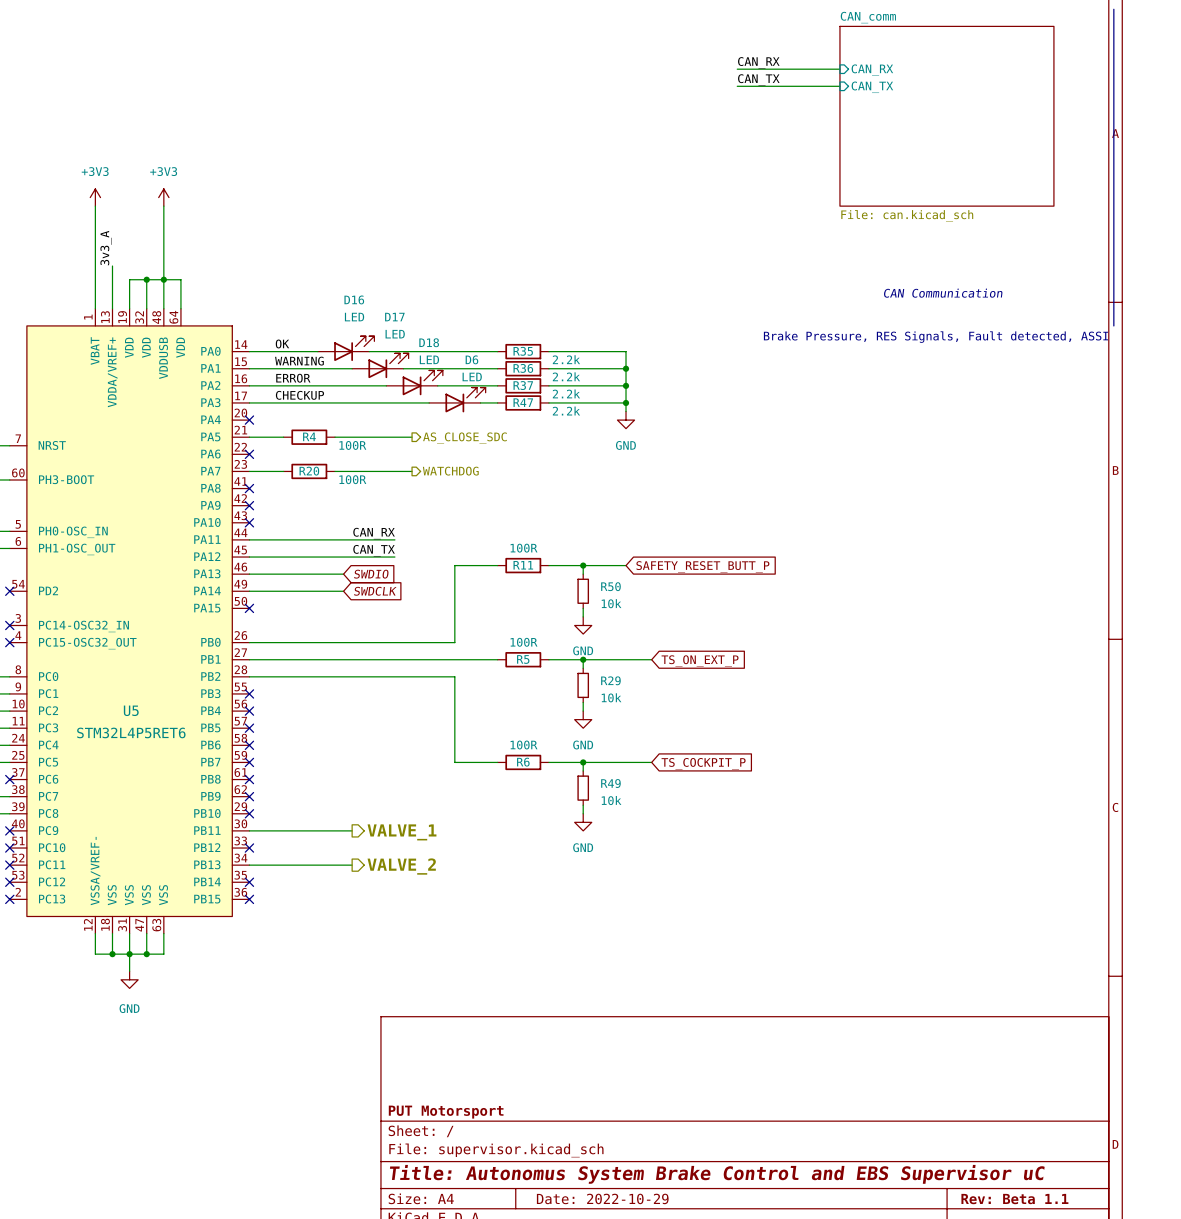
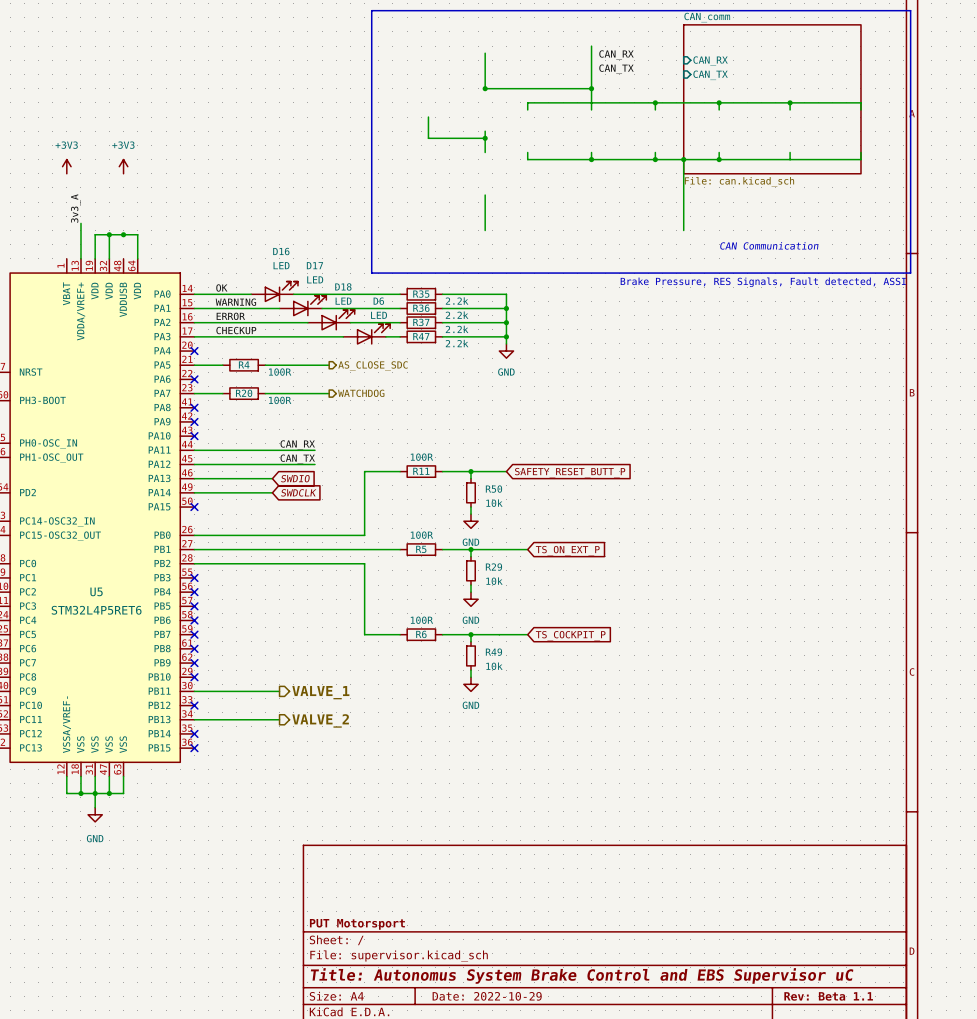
line: none -> (910, 10) (371, 10) (371, 273) (910, 273)
wire: none -> (591, 46) (591, 109)
wire: none -> (485, 53) (485, 88) (591, 88)
wire: (737, 69) (839, 69) -> none
wire: (737, 86) (839, 86) -> none
junction: none -> (485, 88)
junction: none -> (591, 88)
wire: none -> (655, 102) (655, 109)
junction: none -> (655, 102)
wire: none -> (719, 102) (719, 109)
junction: none -> (719, 102)
wire: none -> (790, 102) (790, 109)
junction: none -> (790, 102)
wire: none -> (527, 109) (527, 102) (860, 102) (860, 109)
wire: none -> (428, 117) (428, 138) (485, 138)
wire: none -> (485, 131) (485, 152)
junction: none -> (485, 138)
wire: none -> (527, 152) (527, 159) (860, 159) (860, 152)
wire: none -> (591, 152) (591, 159)
wire: none -> (655, 152) (655, 159)
wire: none -> (719, 152) (719, 159)
wire: none -> (790, 152) (790, 159)
junction: none -> (591, 159)
junction: none -> (655, 159)
wire: none -> (683, 159) (683, 230)
junction: none -> (683, 159)
junction: none -> (719, 159)
wire: (95, 206) (95, 308) -> none
wire: (163, 206) (163, 308) -> none
wire: none -> (485, 195) (485, 230)

